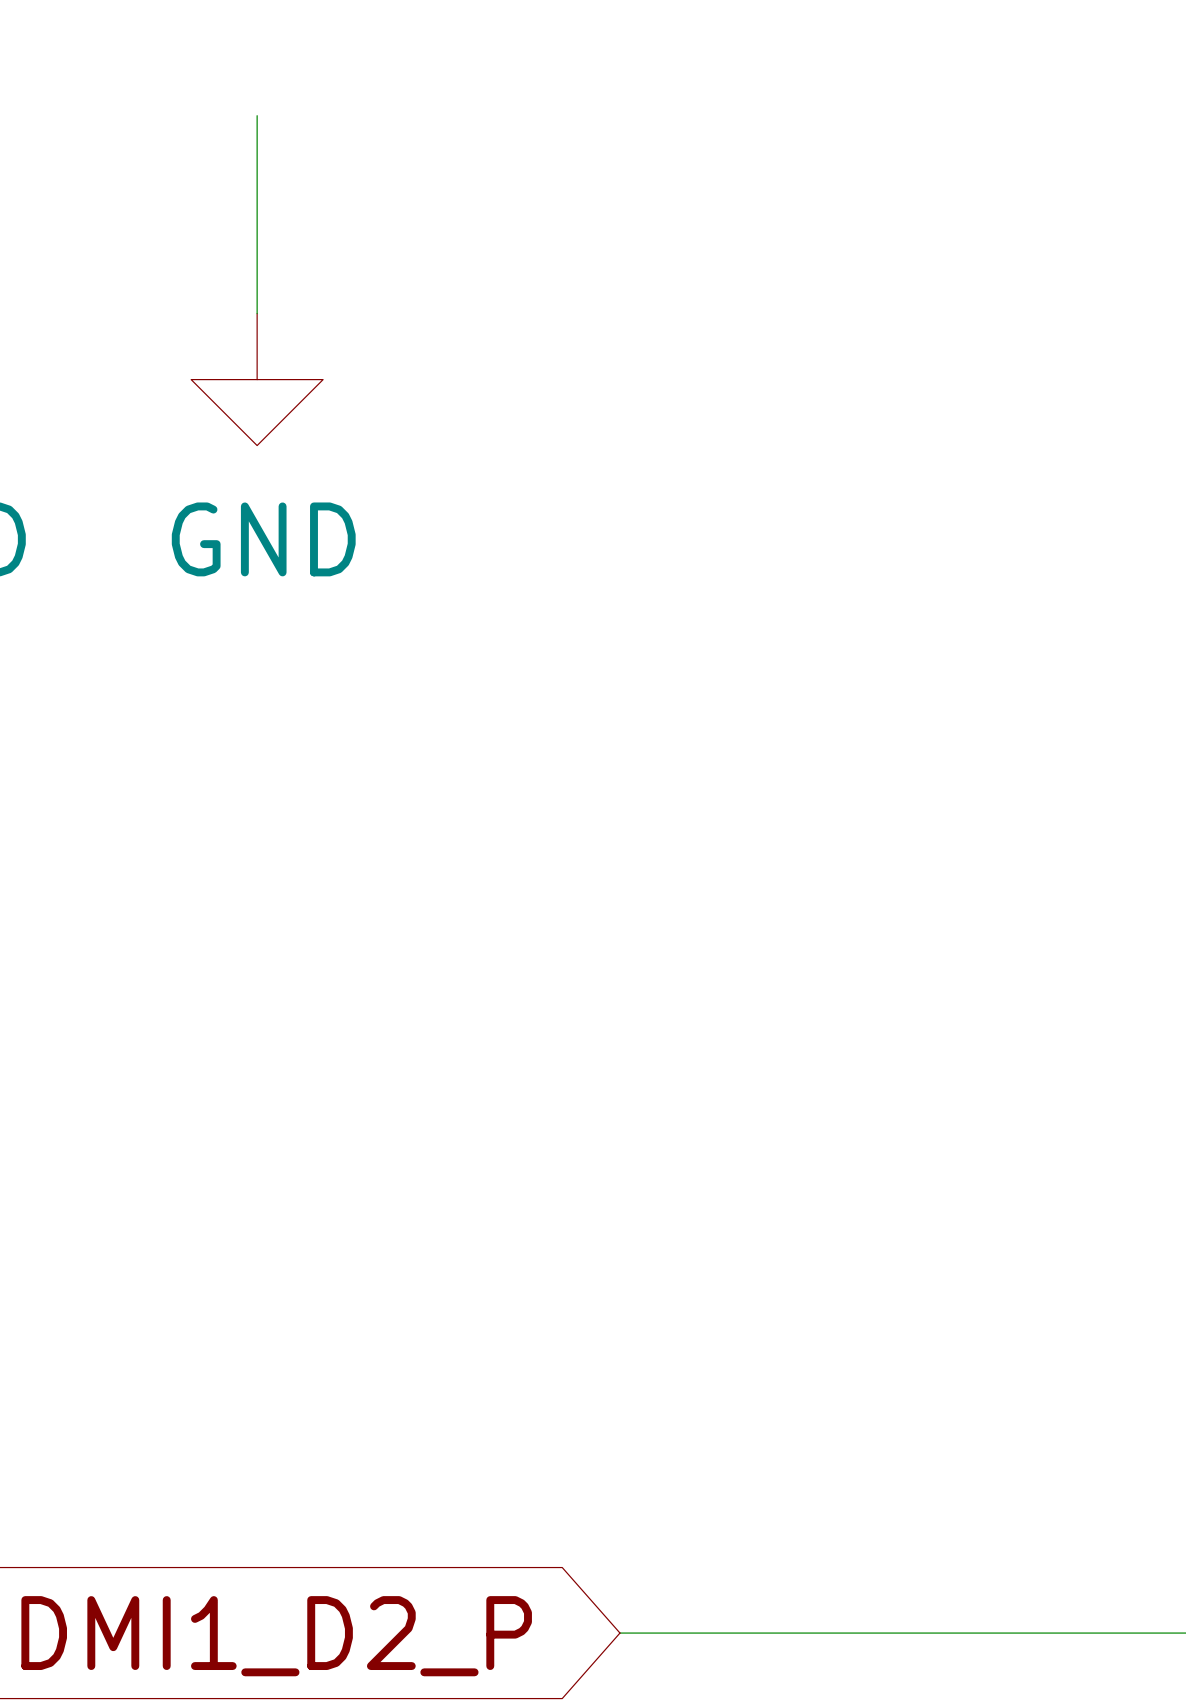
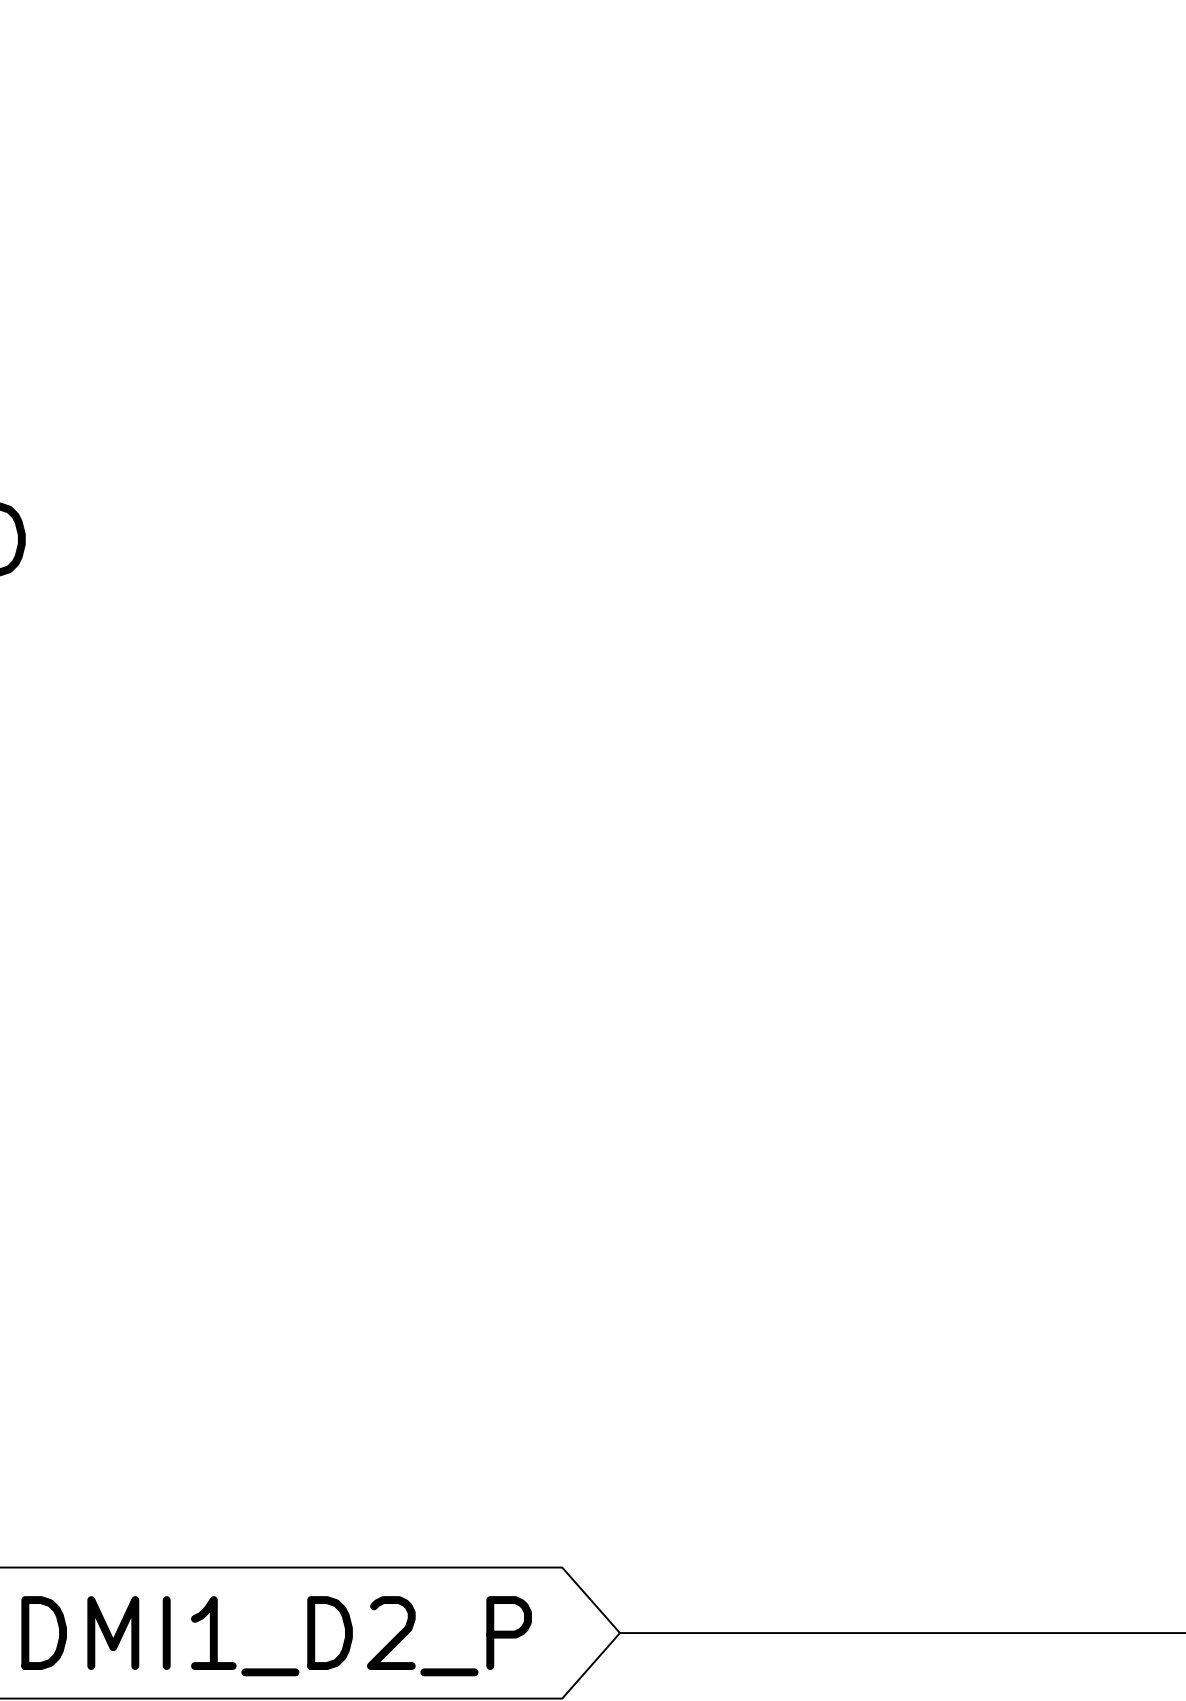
wire: (257, 115) (257, 313) -> none
power symbol: GND (257, 379) -> none

